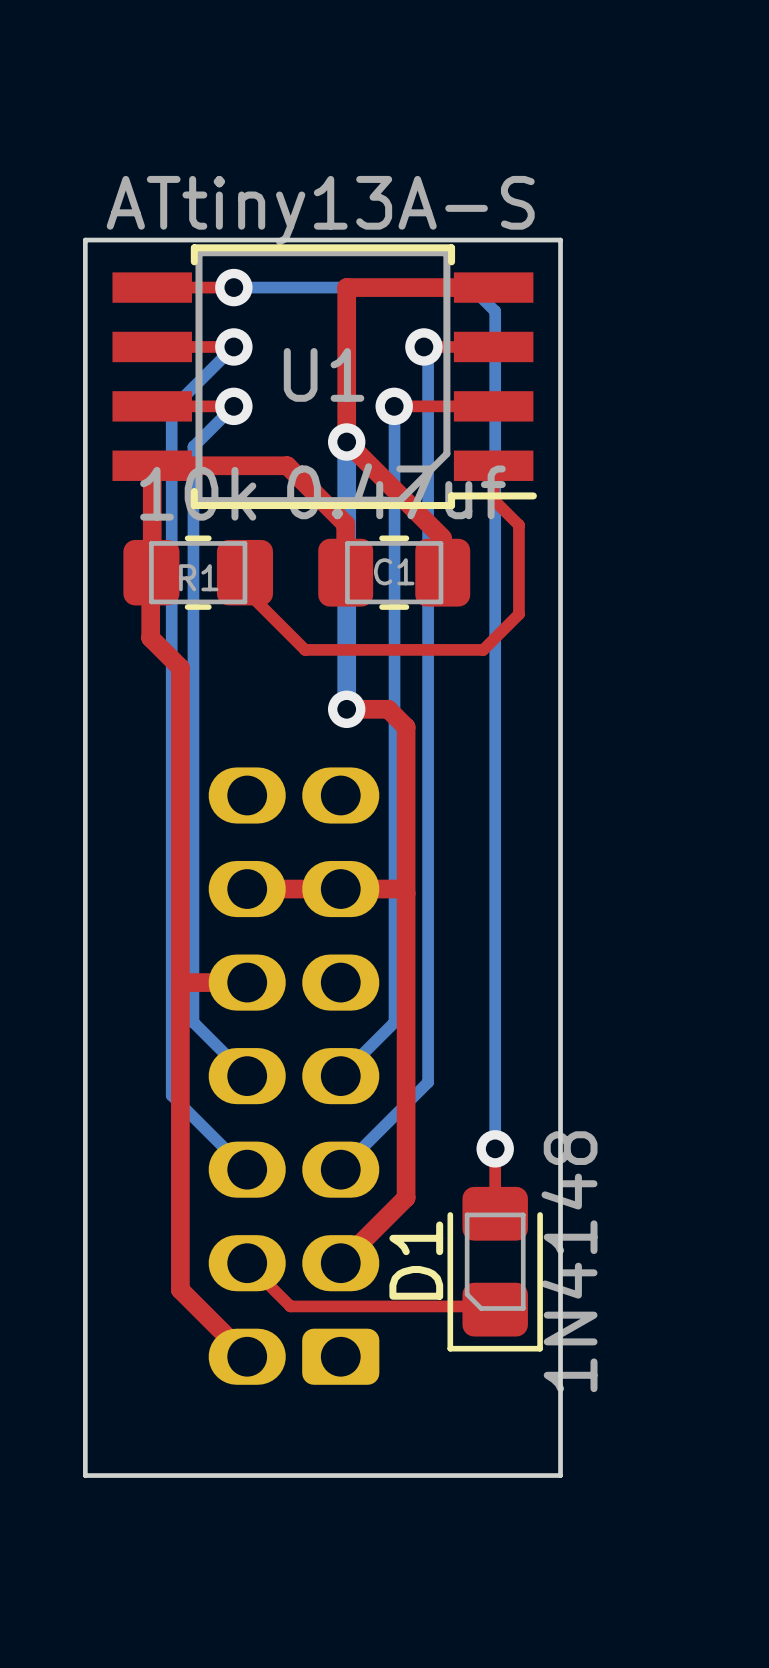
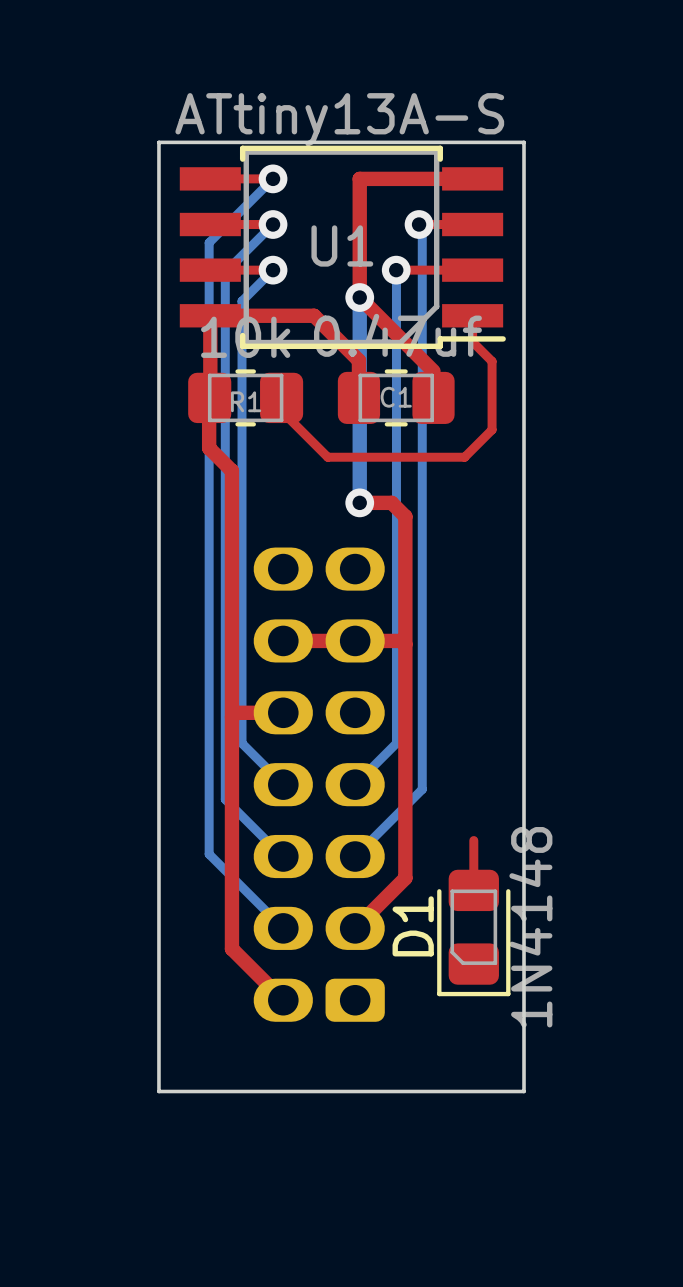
bottom track: (233, 287) (471, 287) (495, 311) (495, 1148) -> (273, 178) (209, 242) (209, 854) (283, 928)
via: (495, 1148) -> none
top track: (247, 1263) (290, 1306) (491, 1306) (495, 1309) -> none

